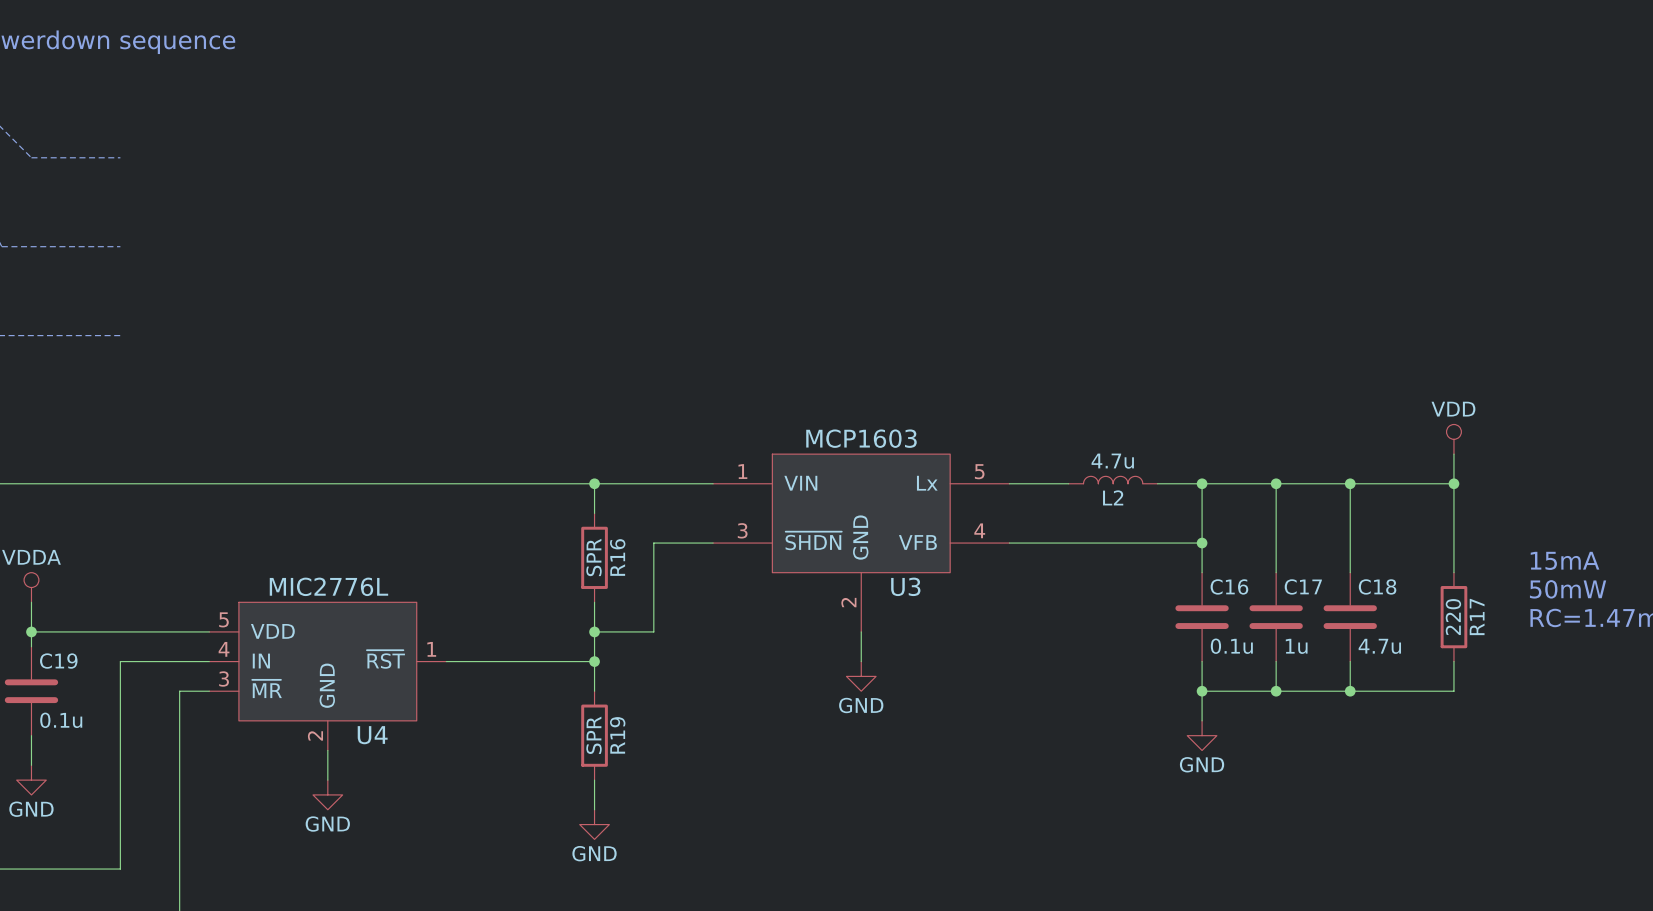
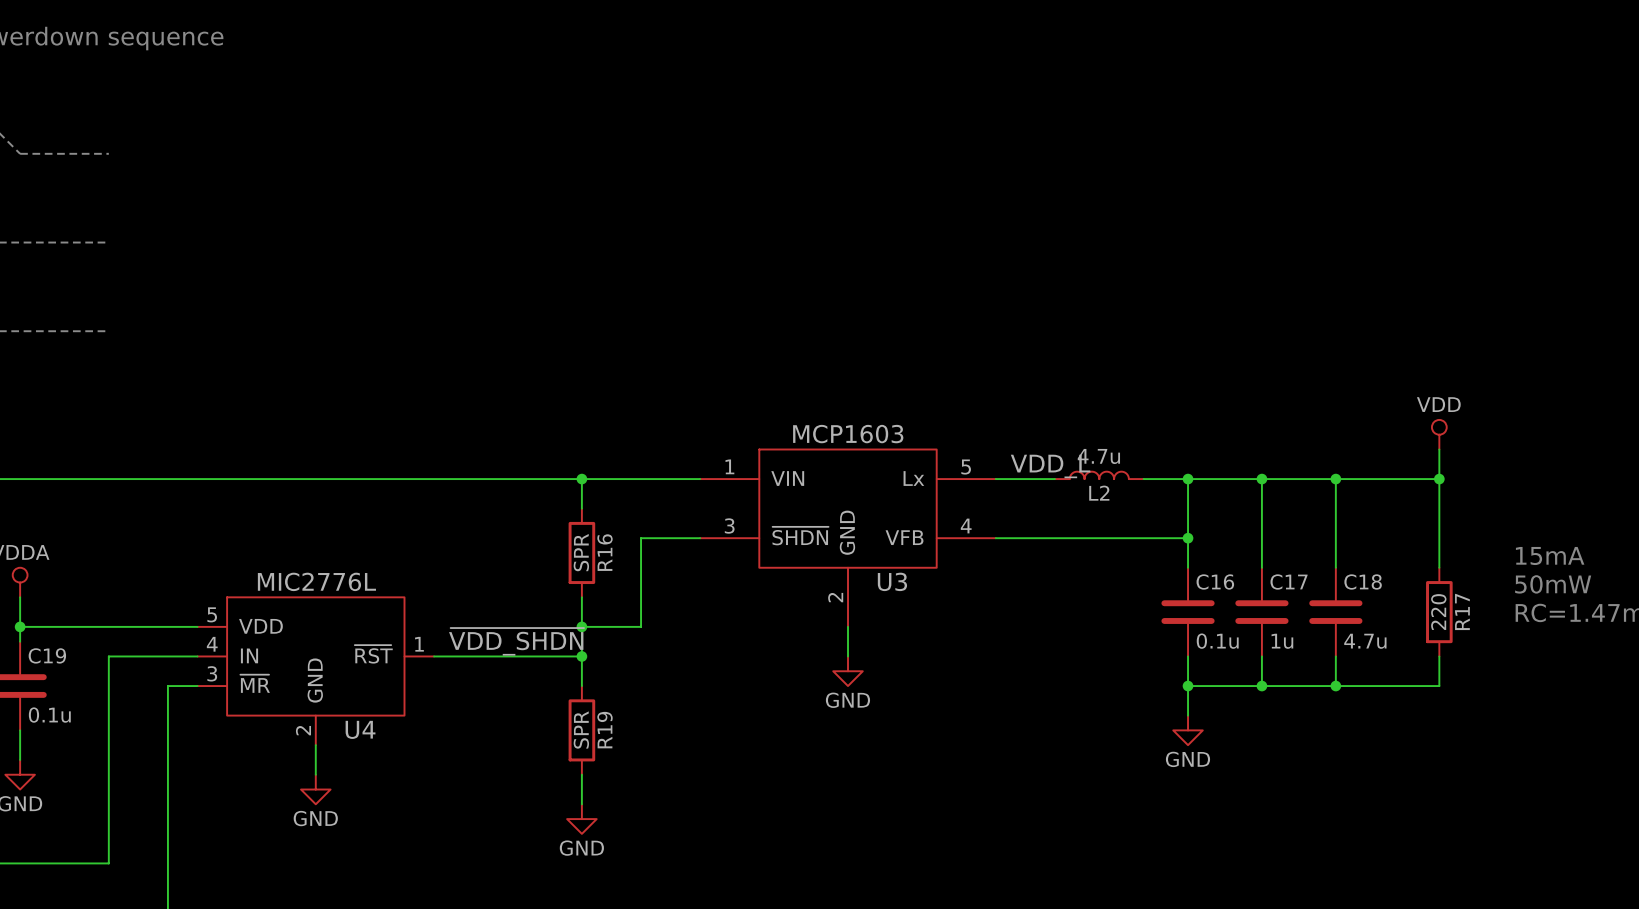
label: none -> VDD_L (1050, 466)
label: none -> ~{VDD_SHDN} (516, 641)

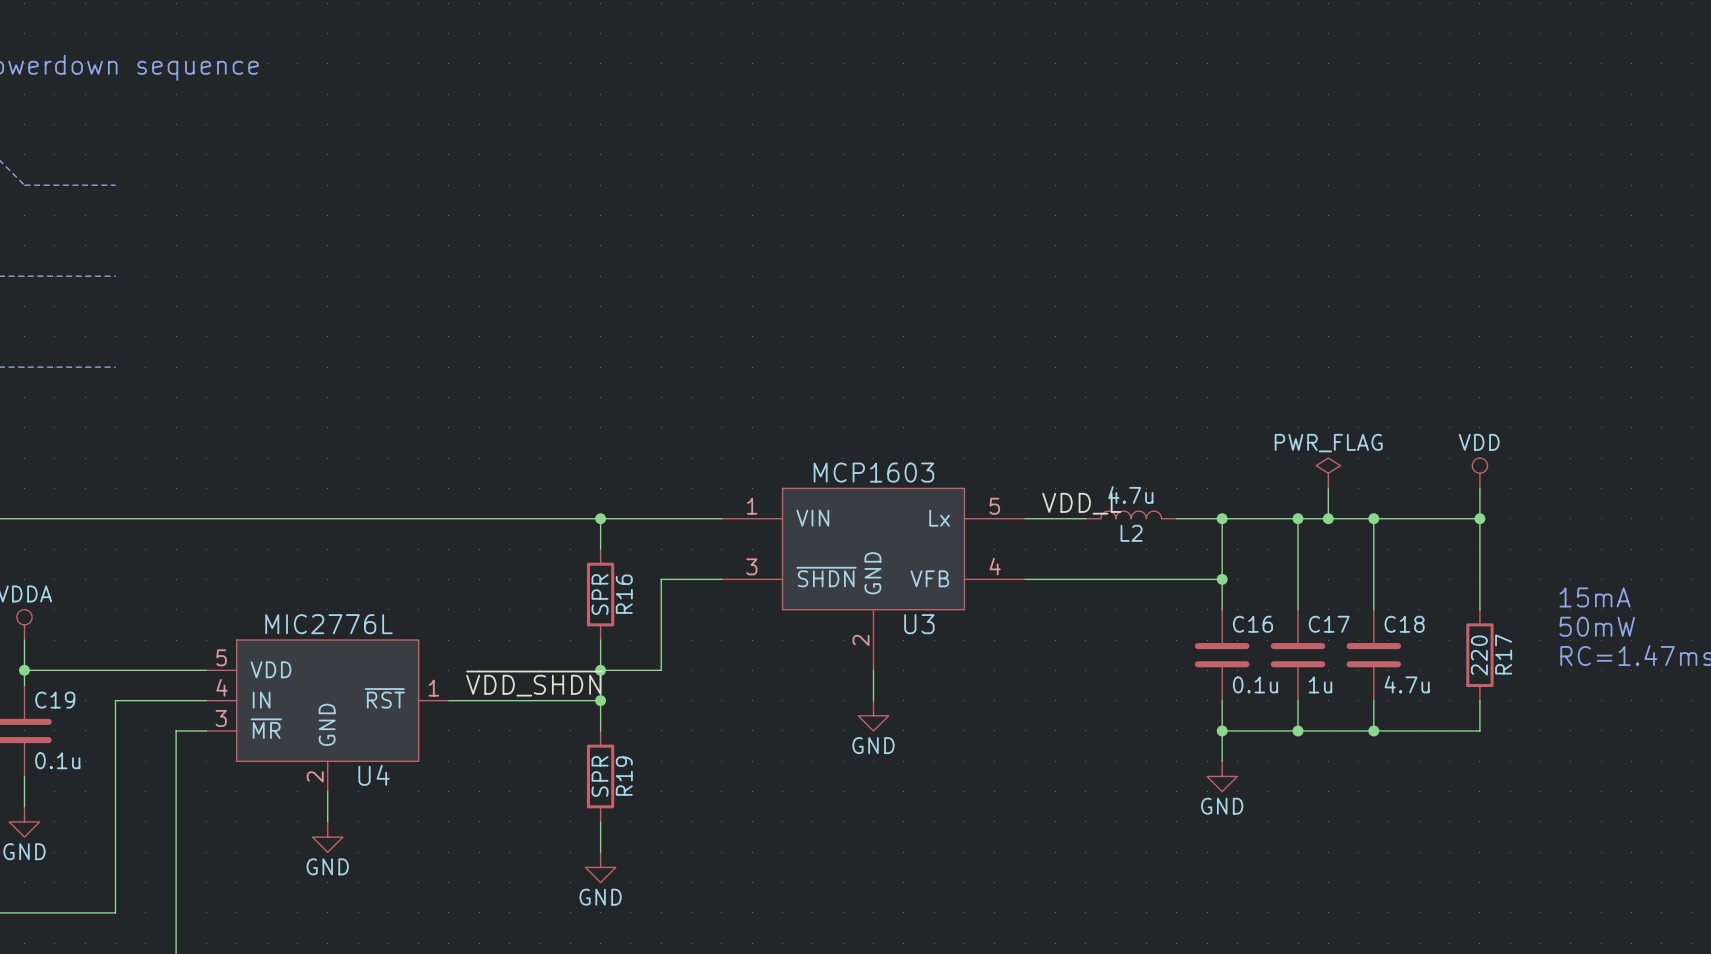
power symbol: none -> PWR_FLAG (1328, 473)
wire: none -> (1328, 488) (1328, 518)
junction: none -> (1328, 518)

